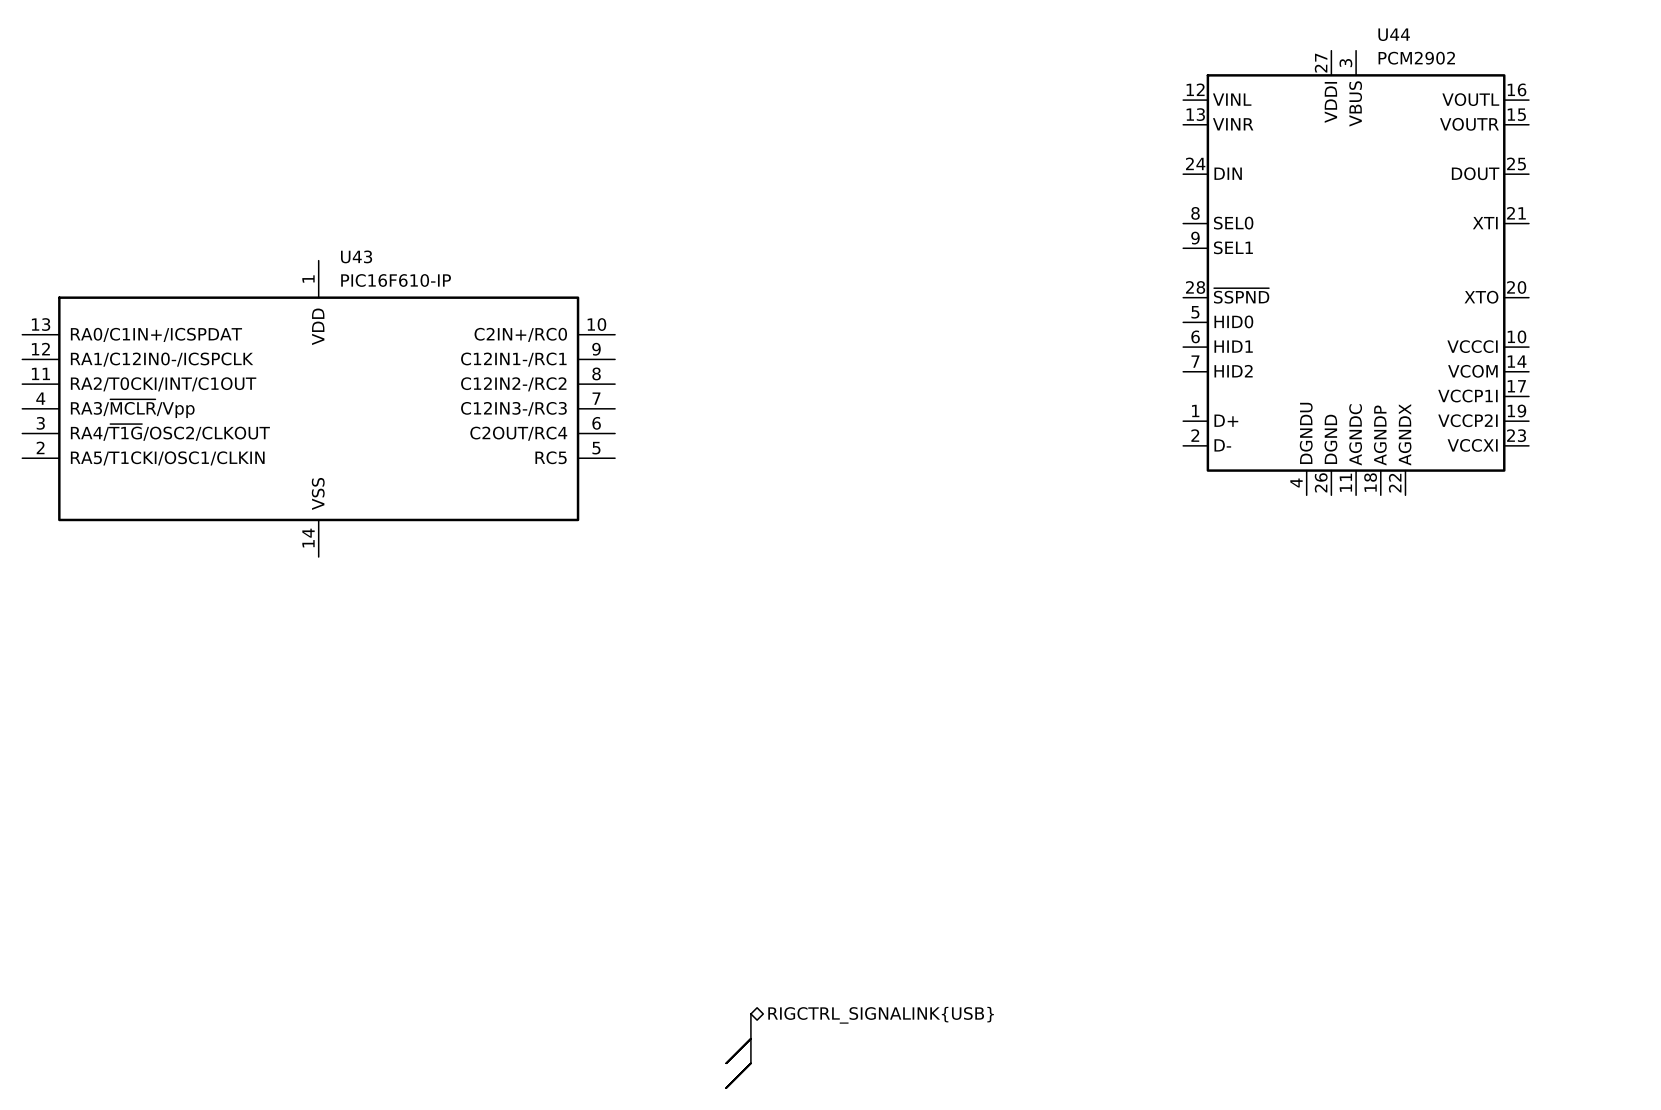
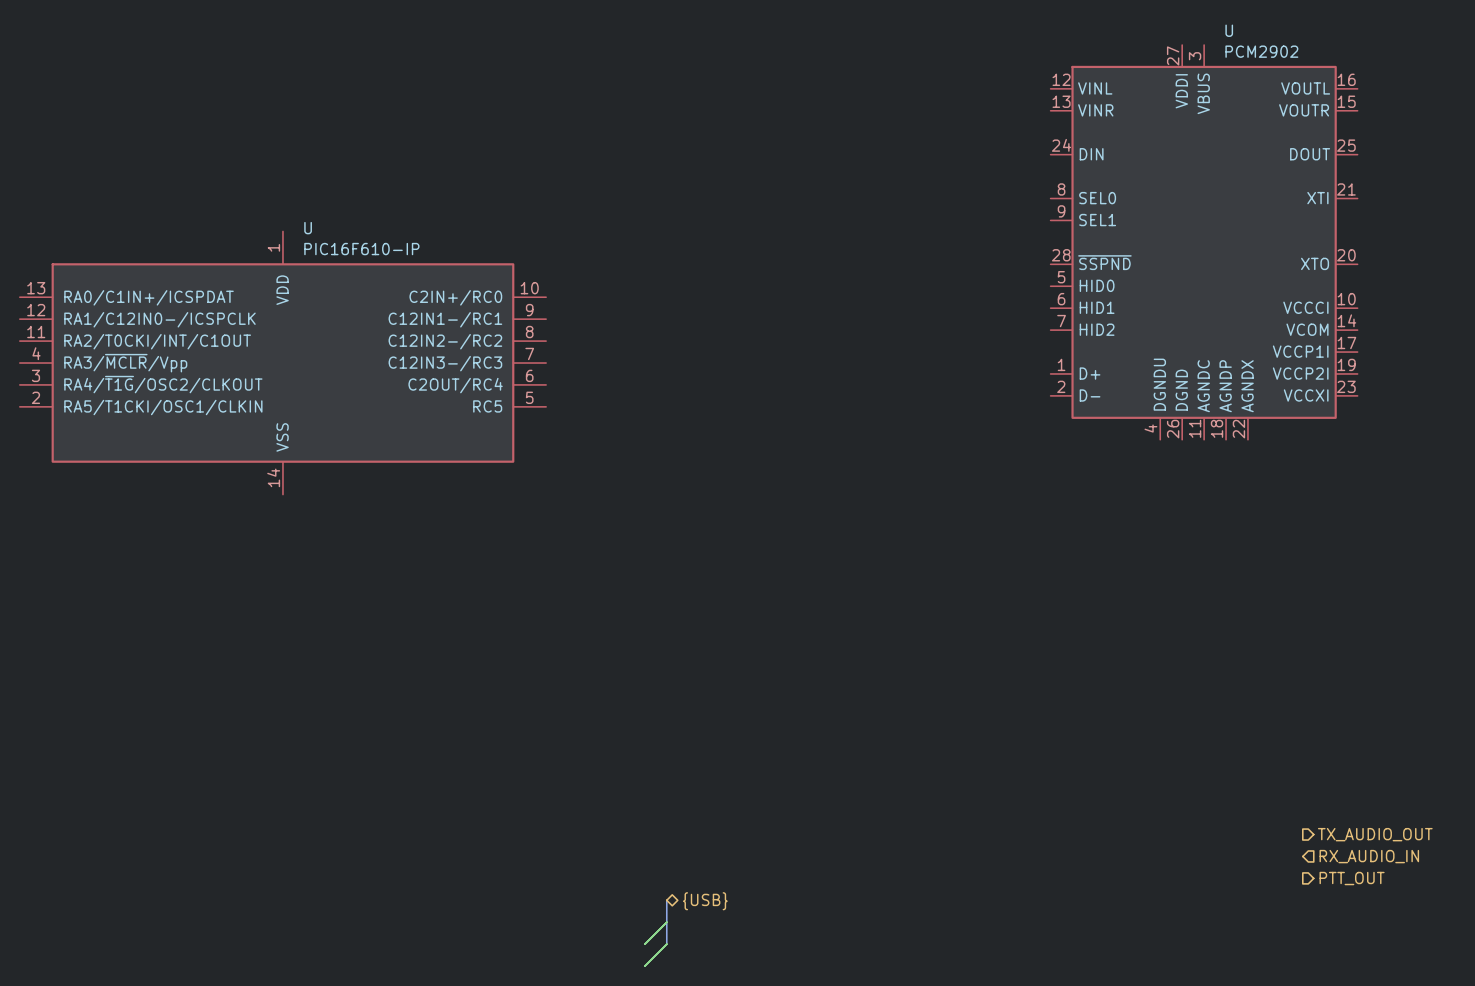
U44 name: U44 (1394, 34) -> U (1229, 30)
U43 name: U43 (356, 256) -> U (308, 228)
hierarchical label: none -> TX_AUDIO_OUT (1375, 834)
hierarchical label: none -> RX_AUDIO_IN (1369, 856)
hierarchical label: none -> PTT_OUT (1352, 878)
hierarchical label: RIGCTRL_SIGNALINK{USB} (881, 1015) -> {USB} (705, 901)

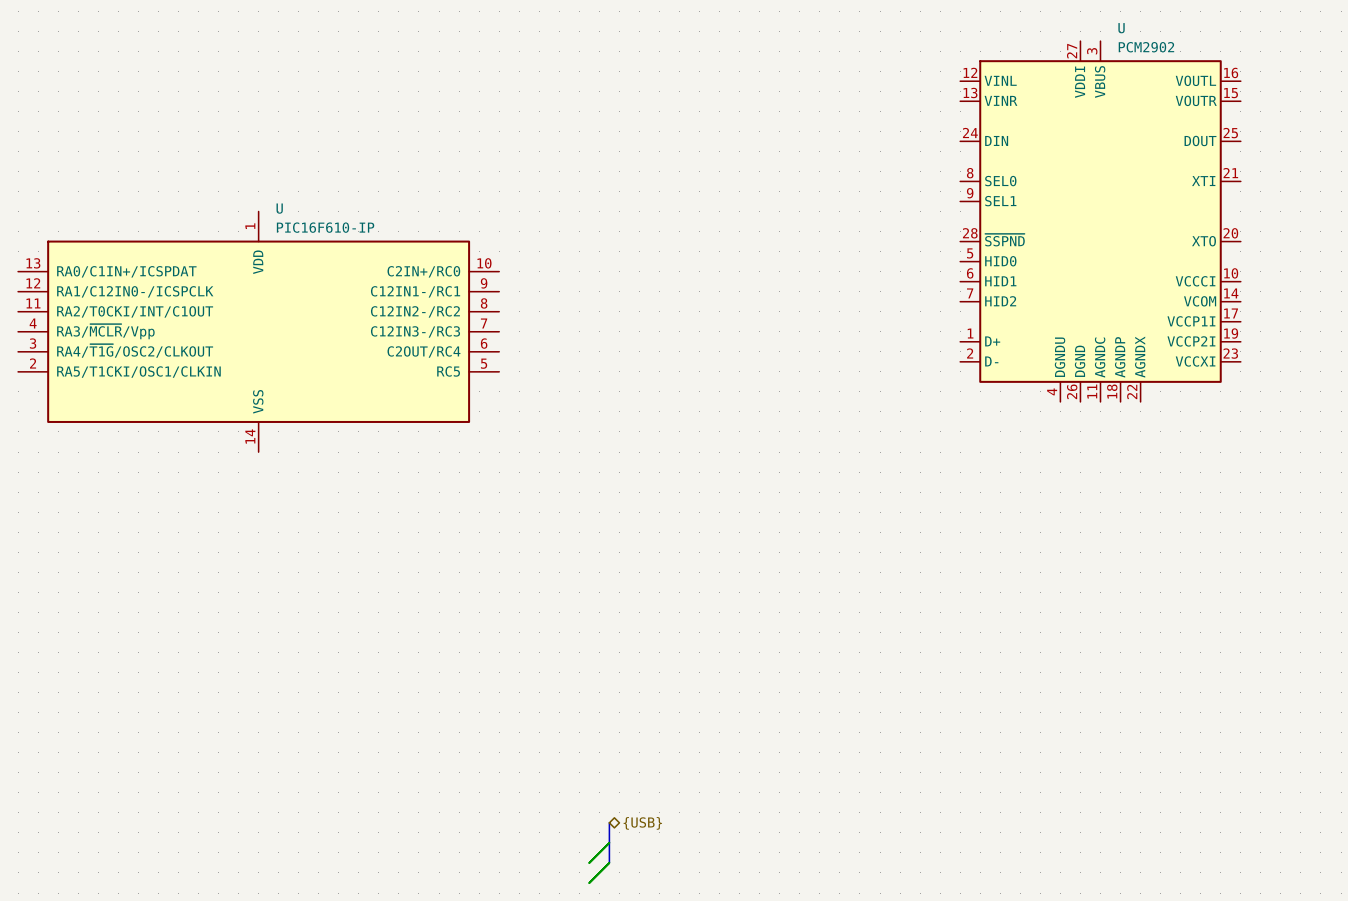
hierarchical label: TX_AUDIO_OUT (1375, 834) -> none
hierarchical label: RX_AUDIO_IN (1369, 856) -> none
hierarchical label: PTT_OUT (1352, 878) -> none

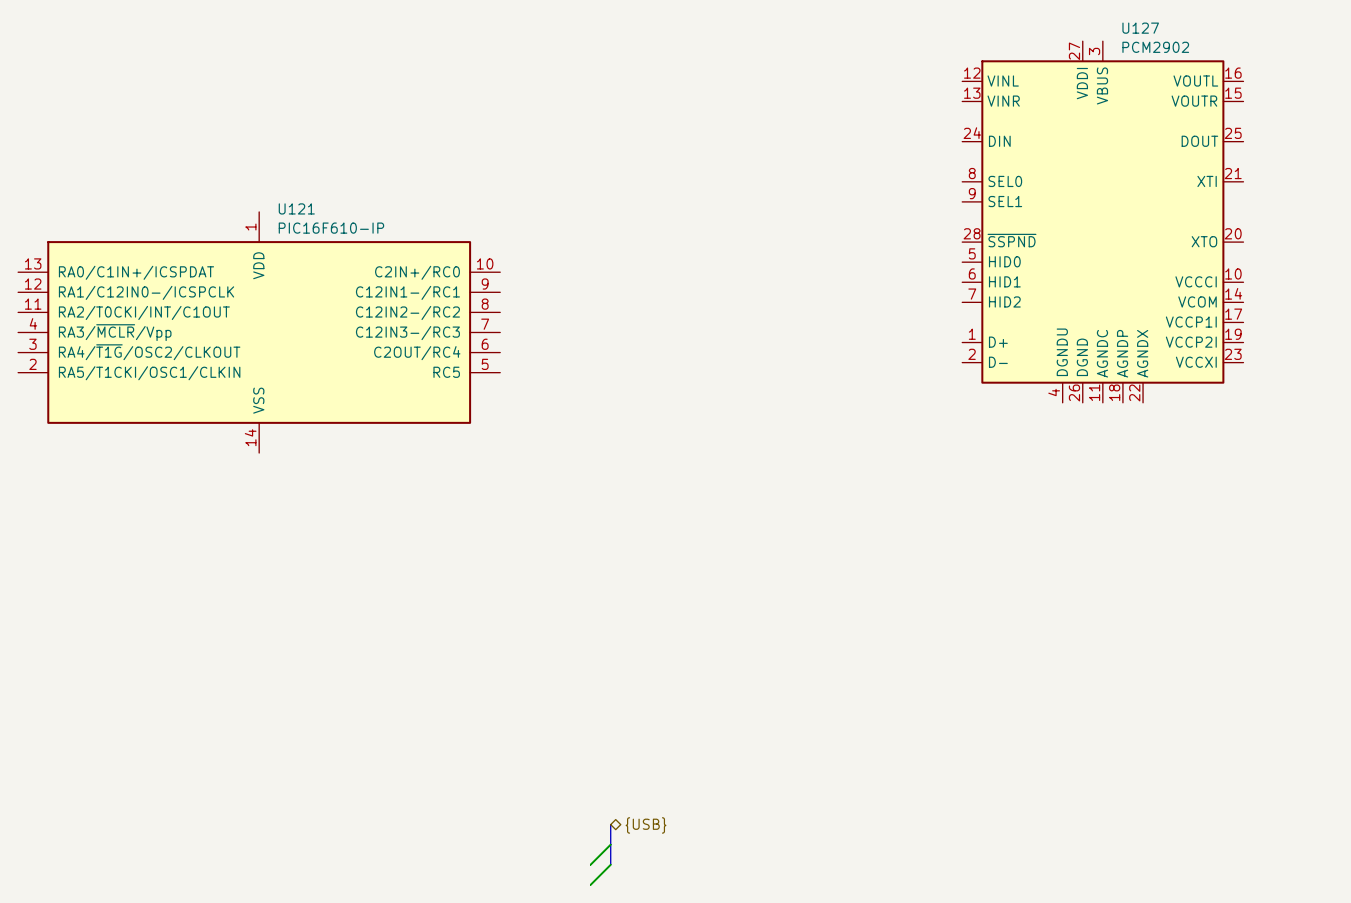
U name: U (1121, 28) -> U127 (1140, 28)
U name: U (279, 208) -> U121 (296, 208)

